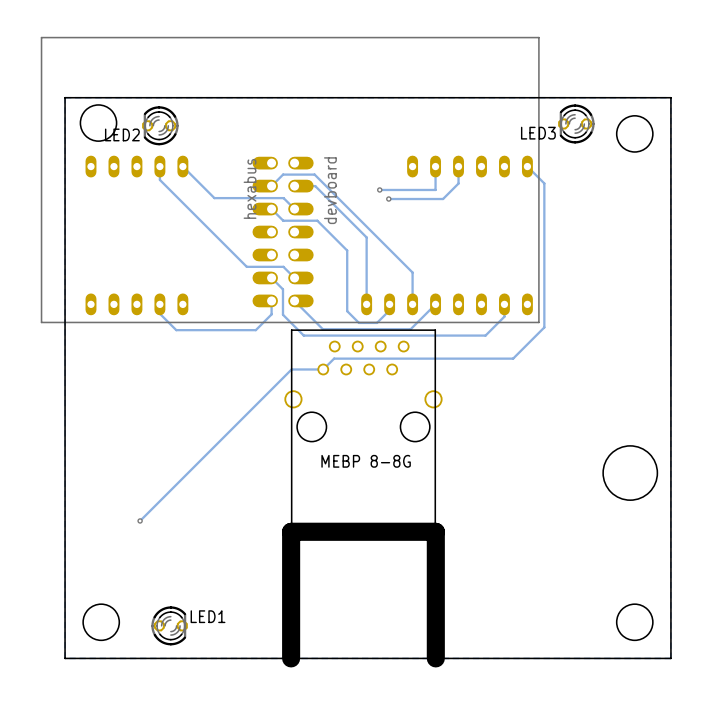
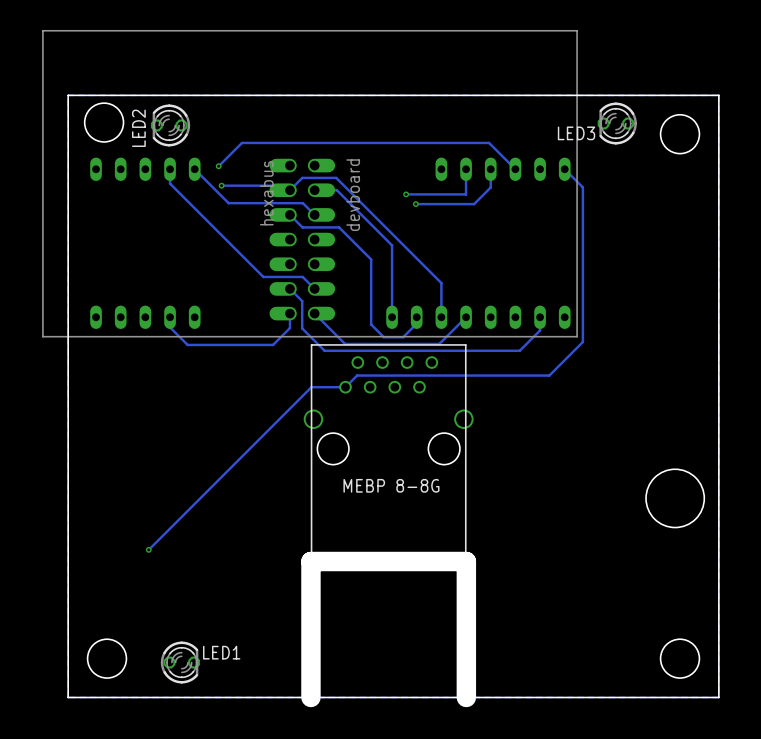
LED2 name rotation: 0° (122, 134) -> 90° counterclockwise (138, 128)
track: none -> (218, 166) (242, 142) (489, 142) (515, 169)
via: none -> (218, 166)
track: none -> (221, 185) (285, 185) (289, 190)
via: none -> (221, 185)

